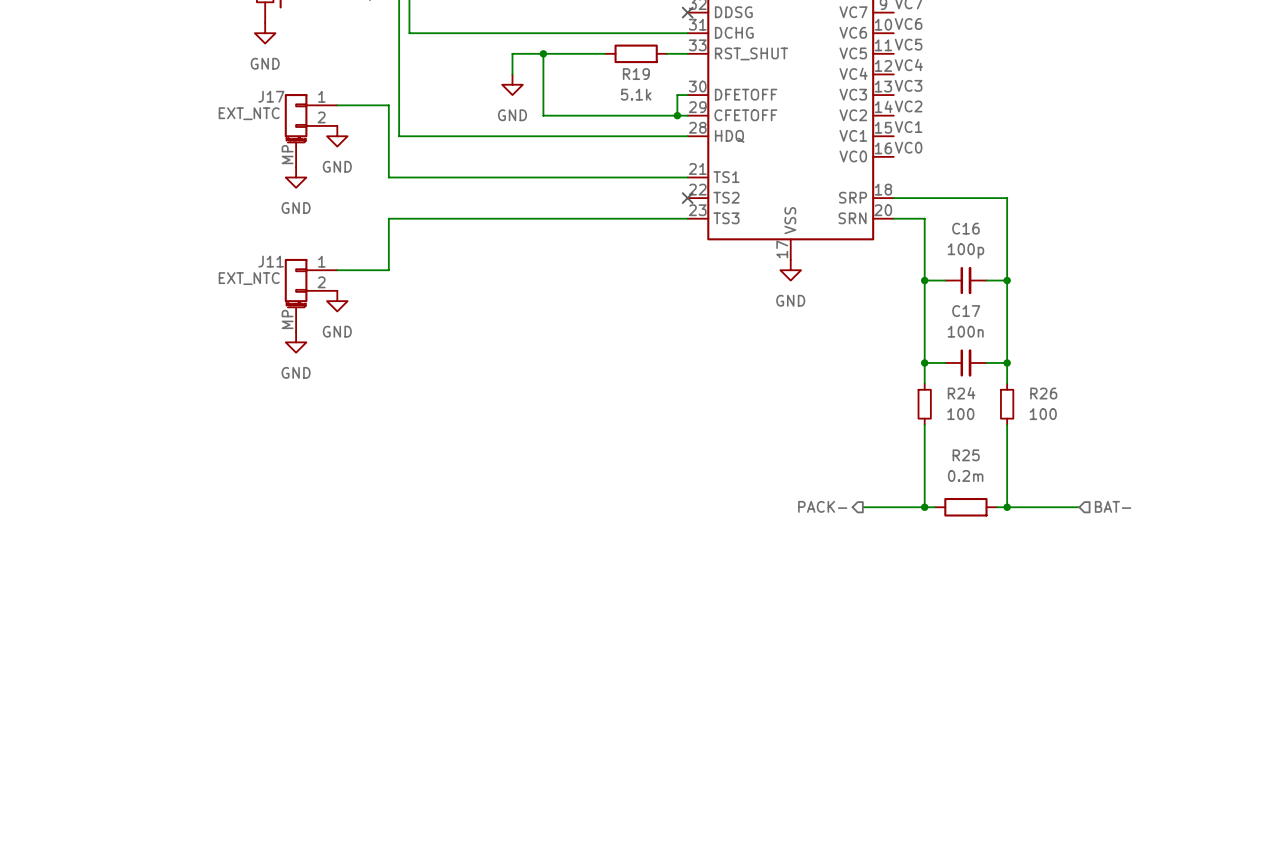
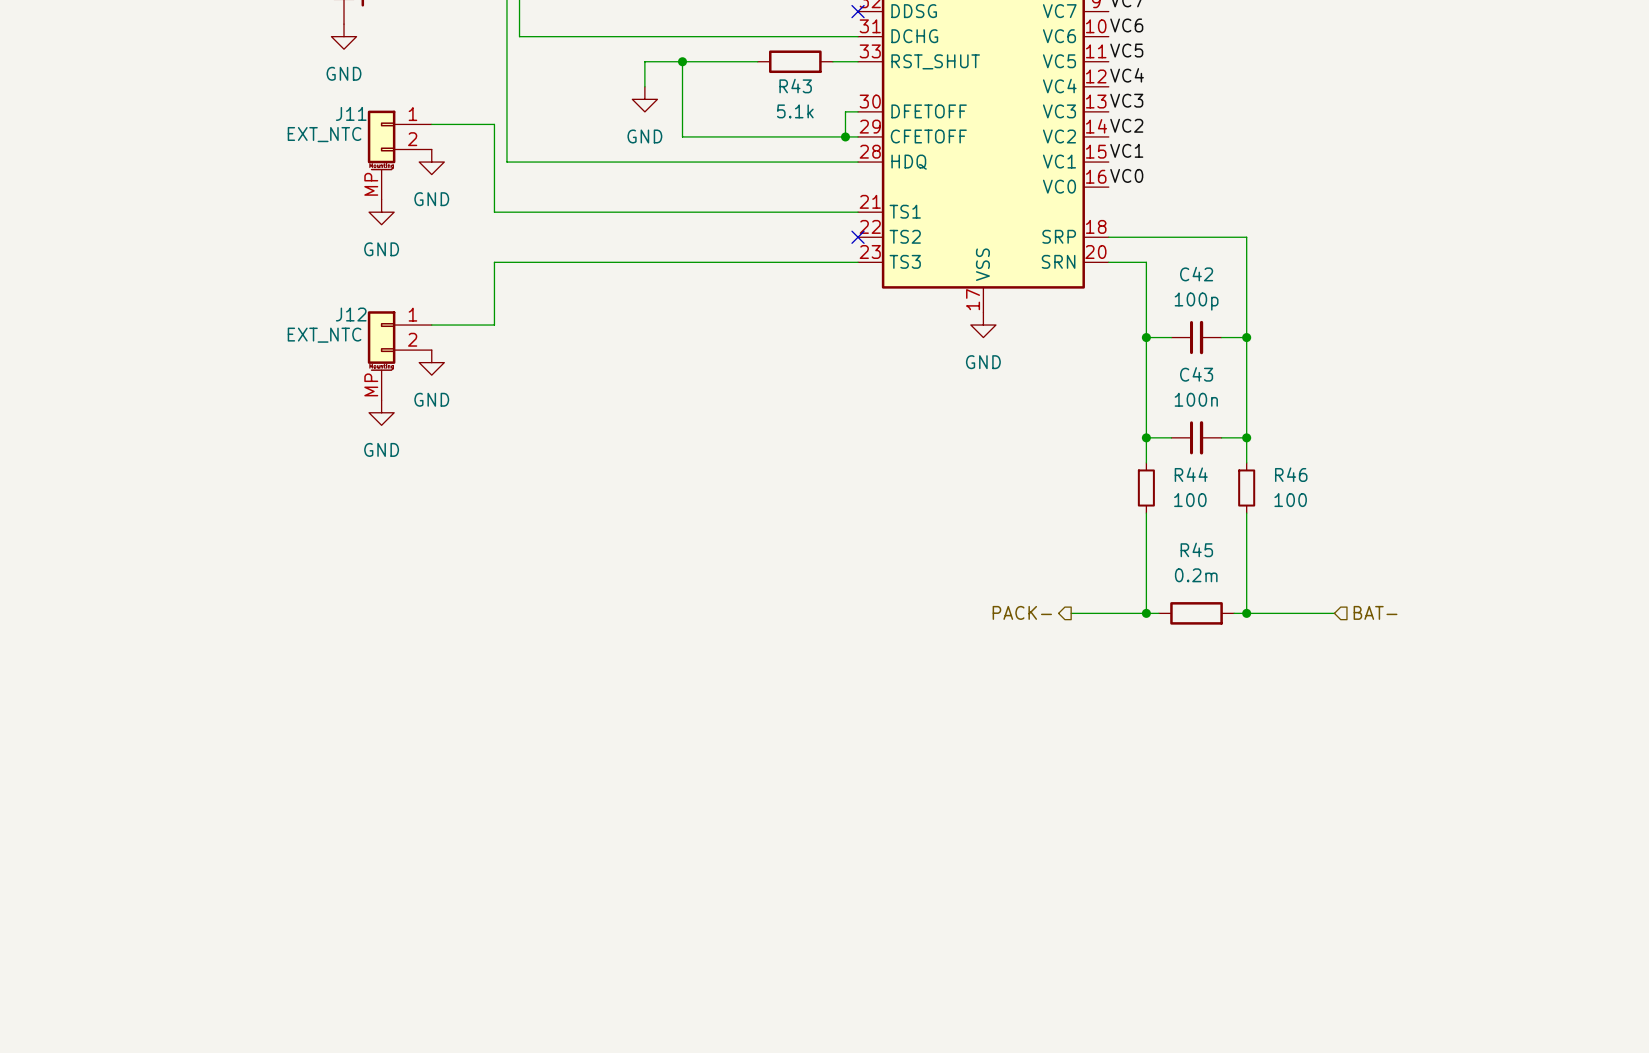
R19 name: R19 (636, 74) -> R43 (795, 86)
J17 name: J17 (271, 96) -> J11 (351, 113)
C16 name: C16 (965, 228) -> C42 (1196, 274)
J11 name: J11 (271, 261) -> J12 (351, 314)
C17 name: C17 (966, 311) -> C43 (1196, 374)
R24 name: R24 (961, 393) -> R44 (1191, 474)
R26 name: R26 (1043, 393) -> R46 (1291, 474)
R25 name: R25 (966, 455) -> R45 (1196, 549)

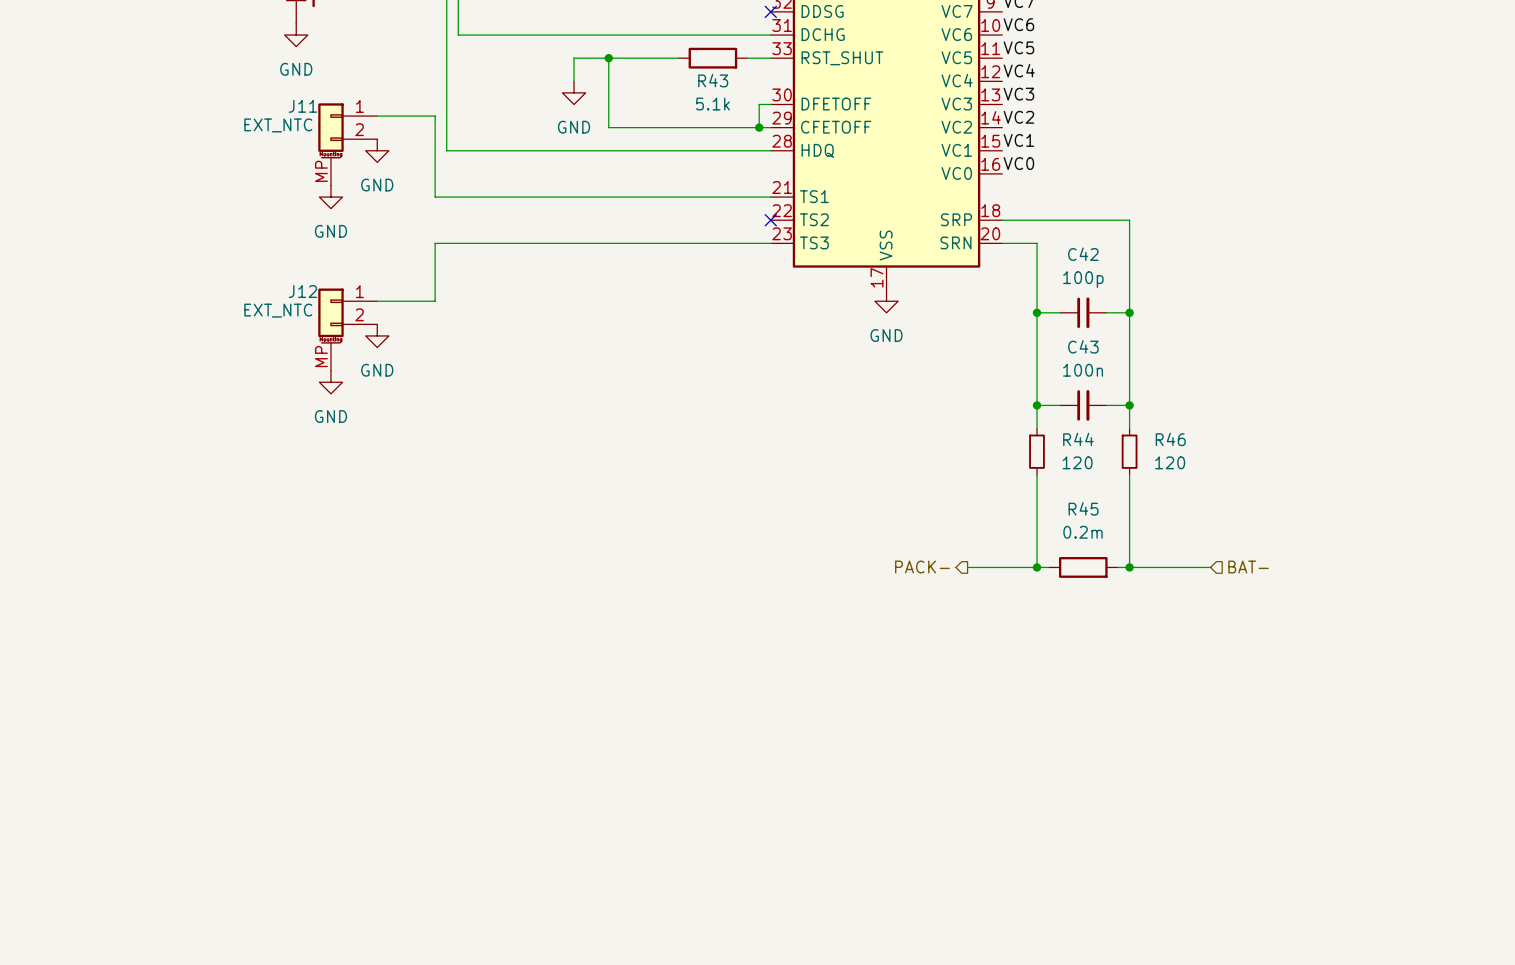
R44 value: 100 (1190, 500) -> 120 (1077, 462)
R46 value: 100 (1290, 500) -> 120 (1170, 462)

